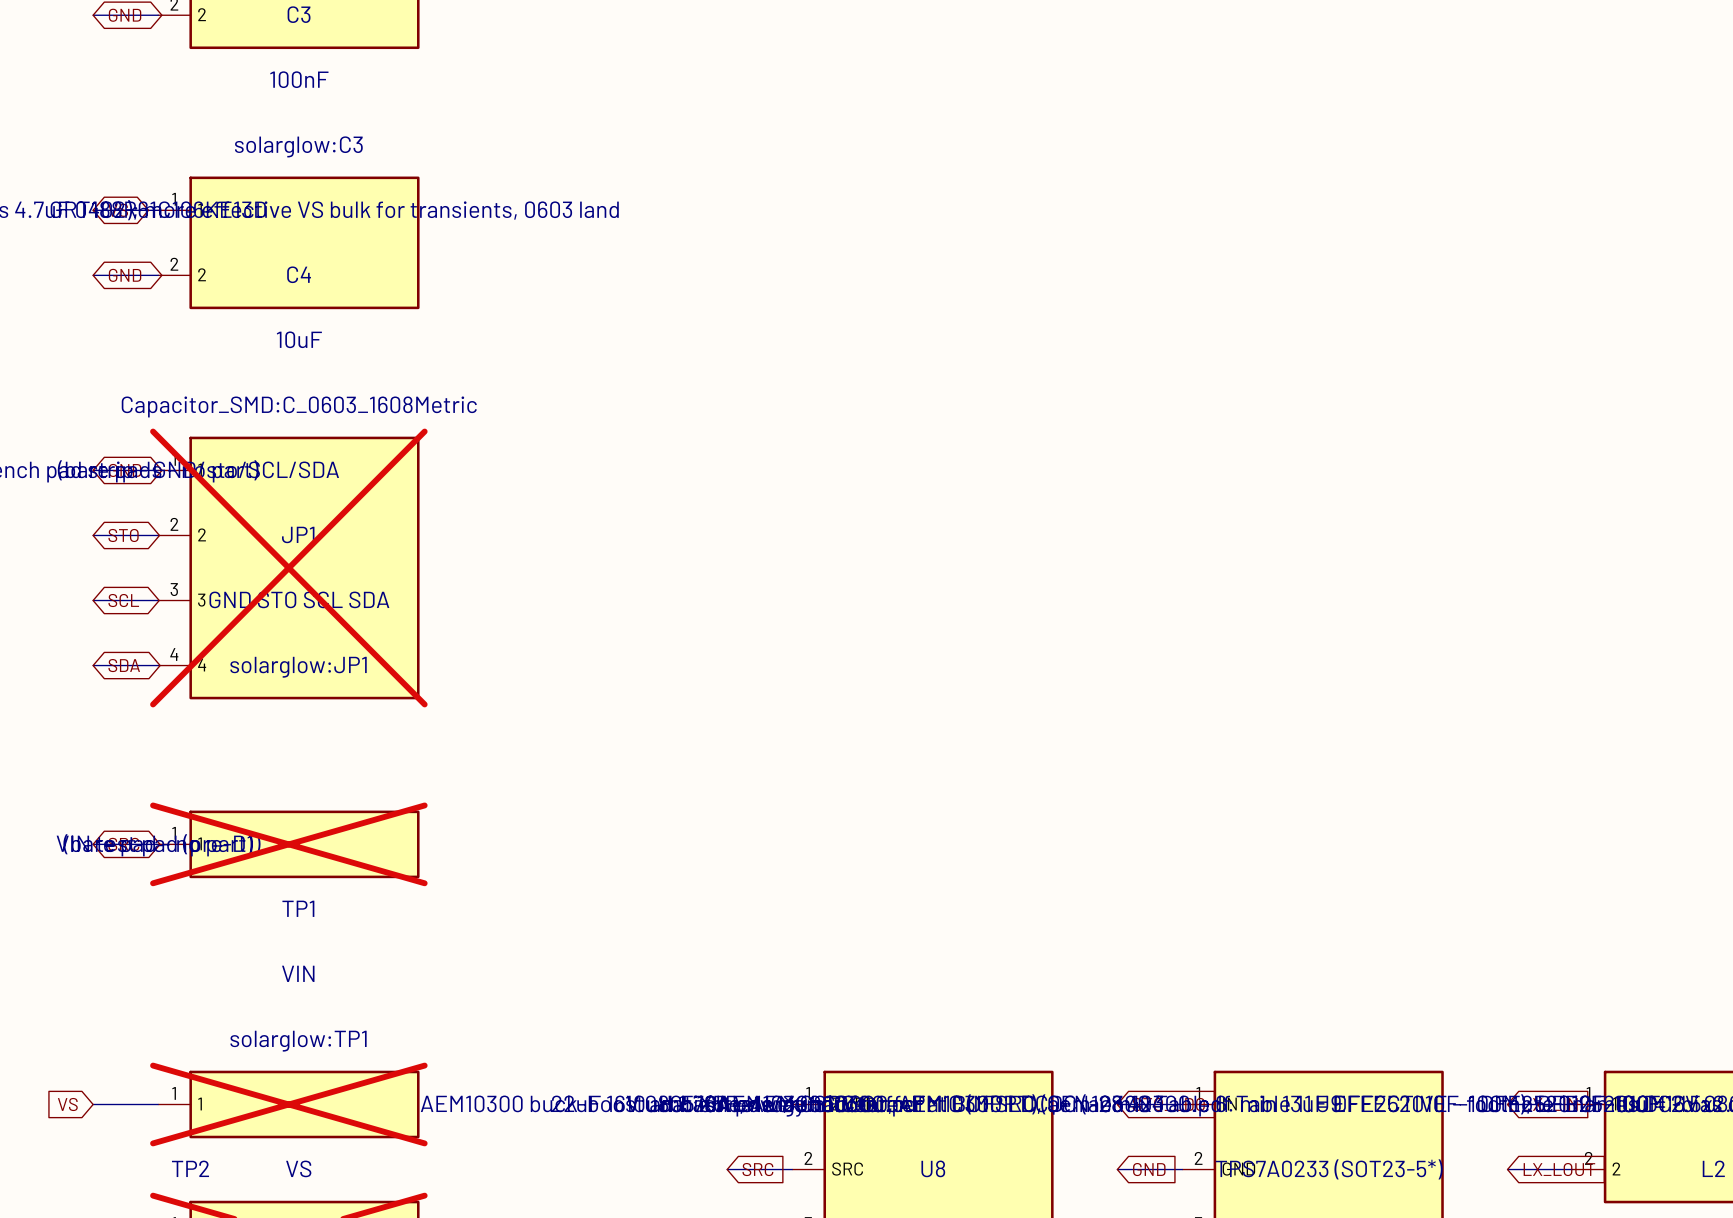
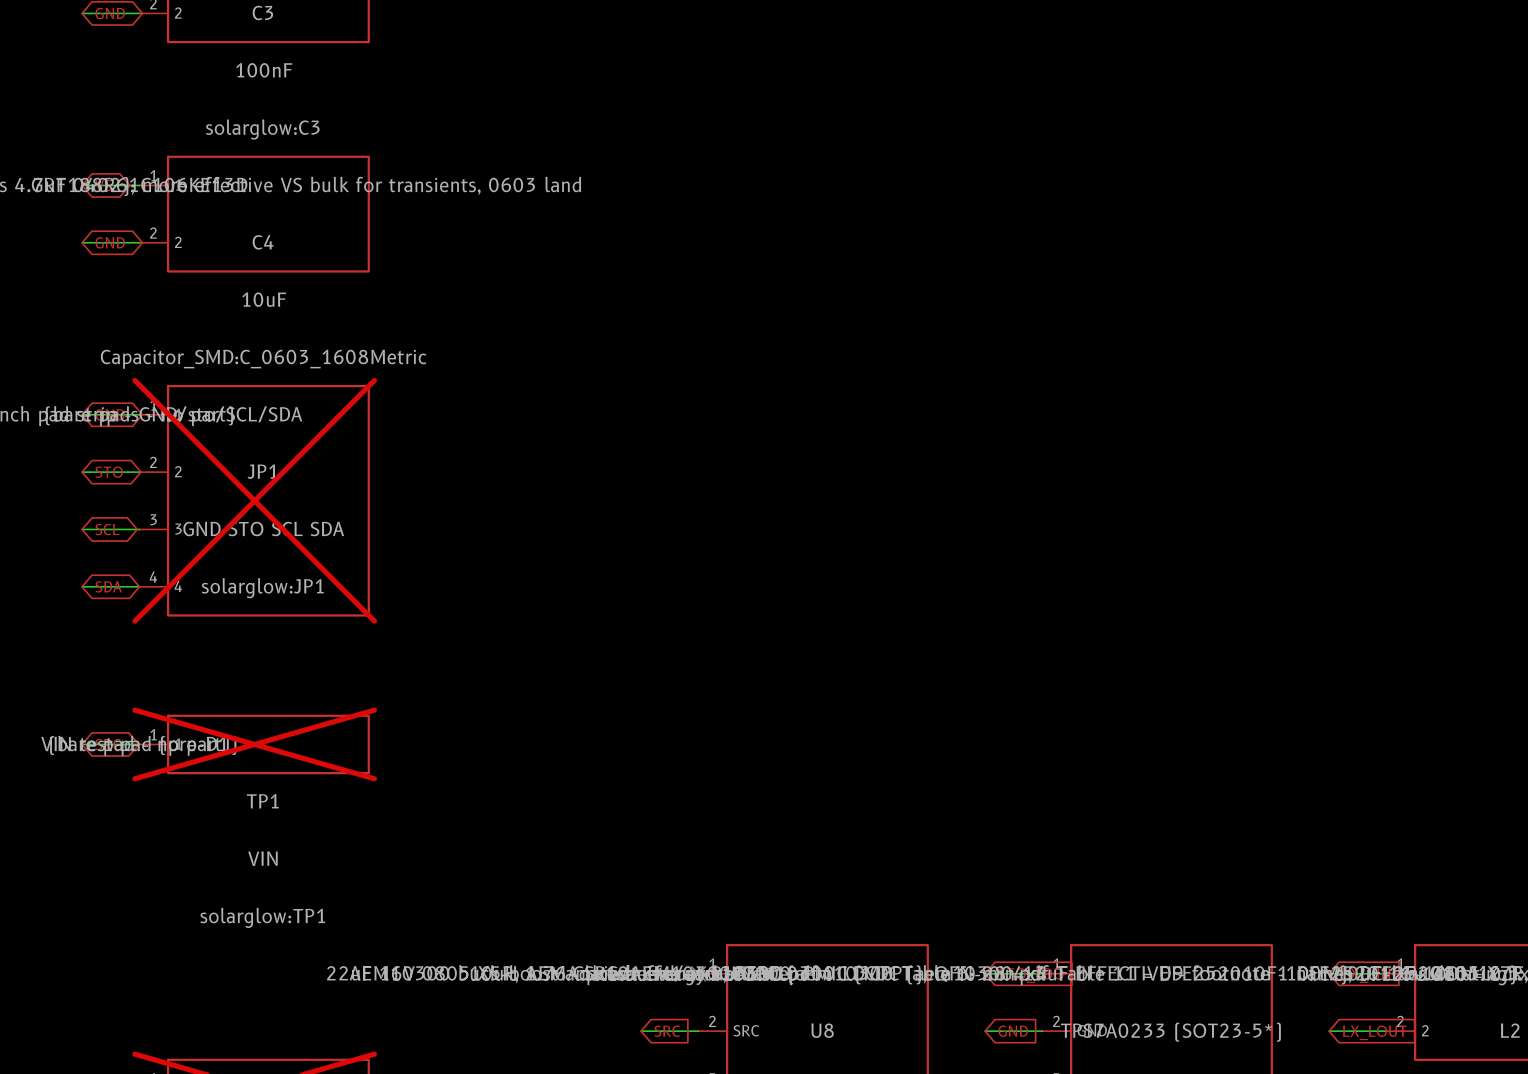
global label: VS (67, 1104) -> none
wire: (93, 1104) (158, 1104) -> none
TP2: VS (288, 1104) -> none

